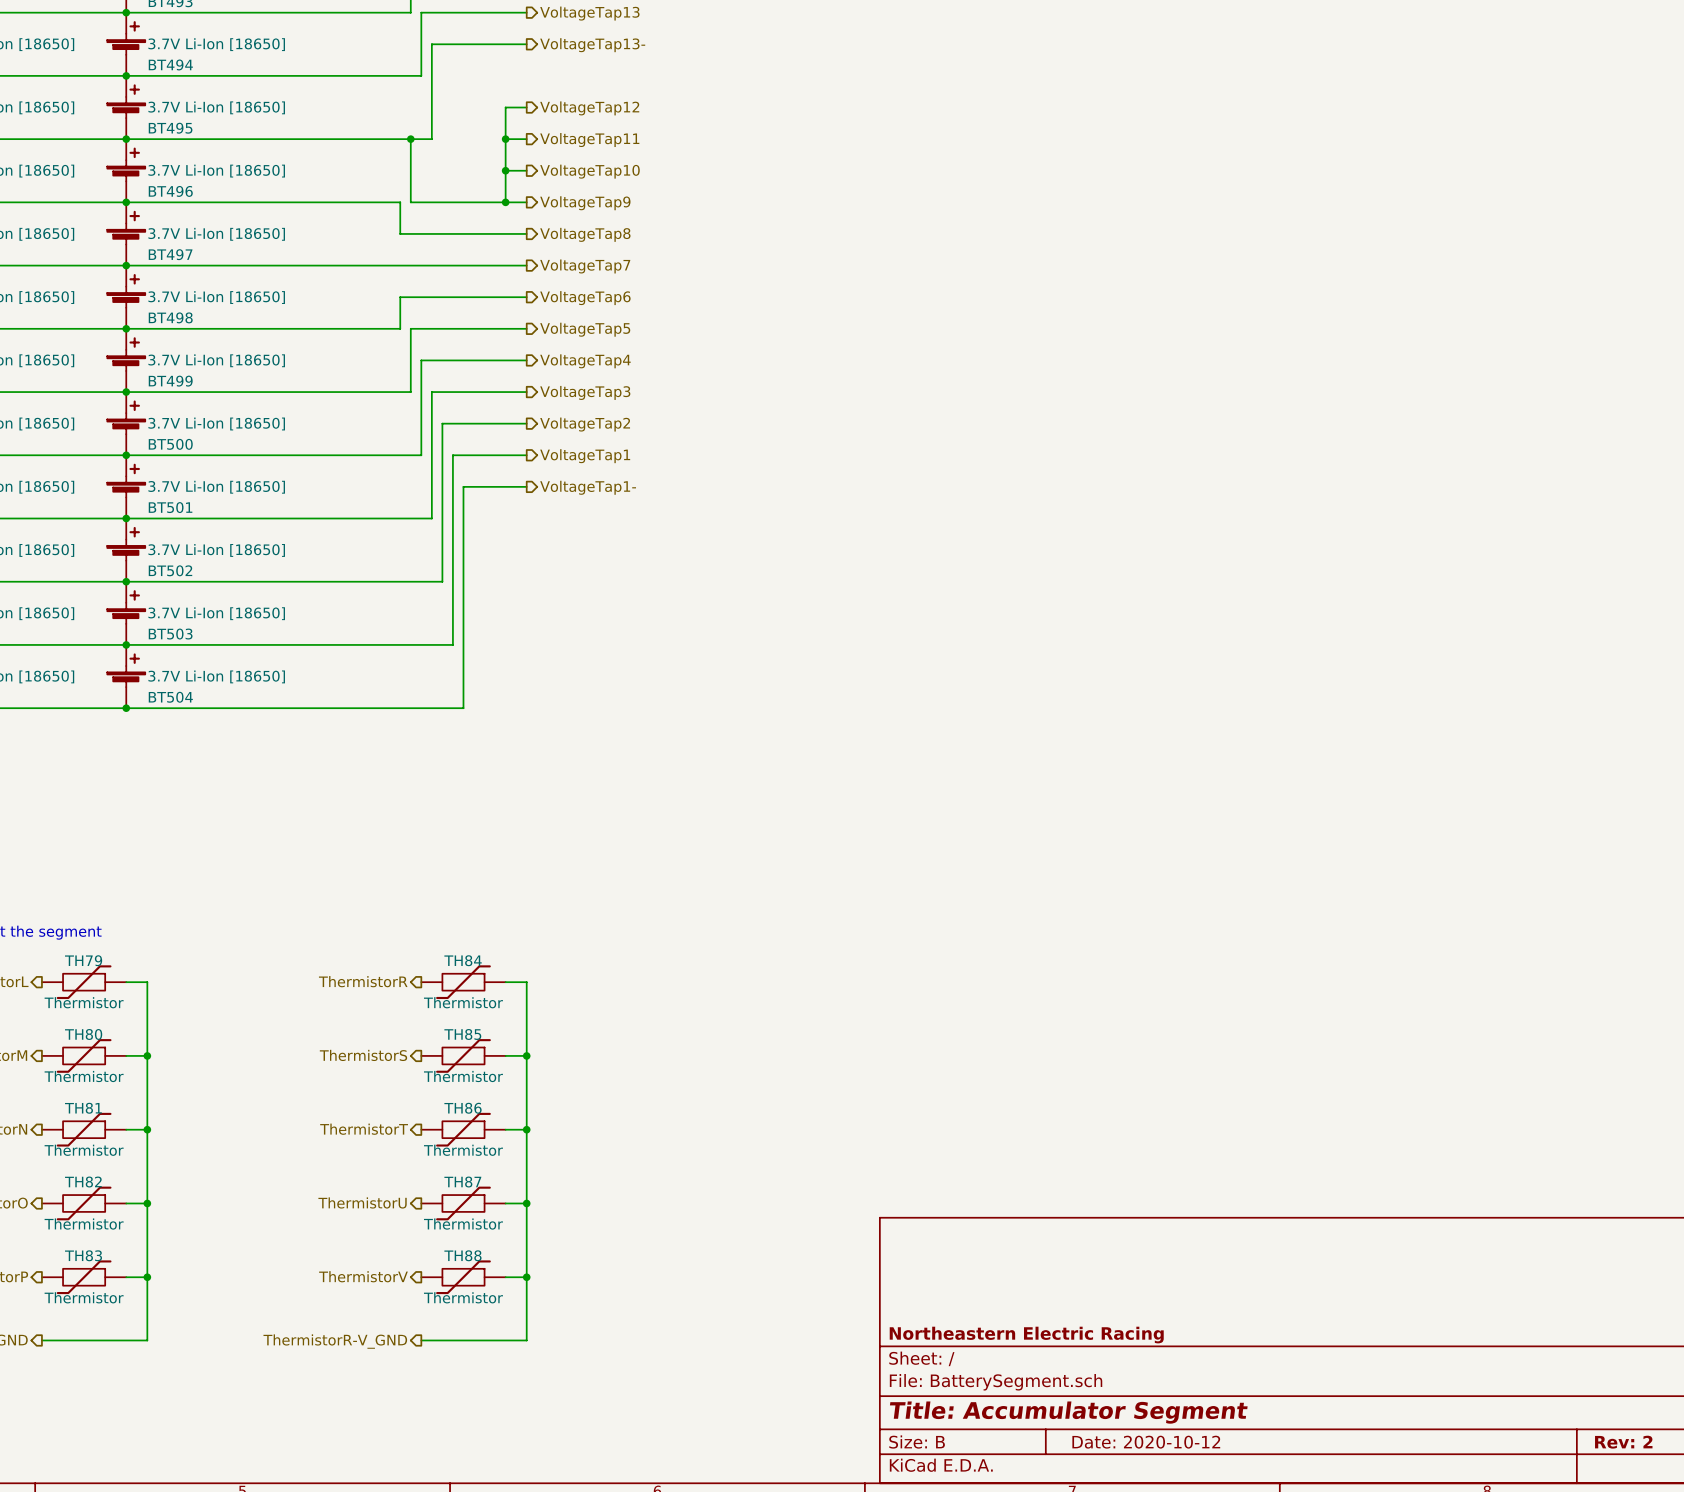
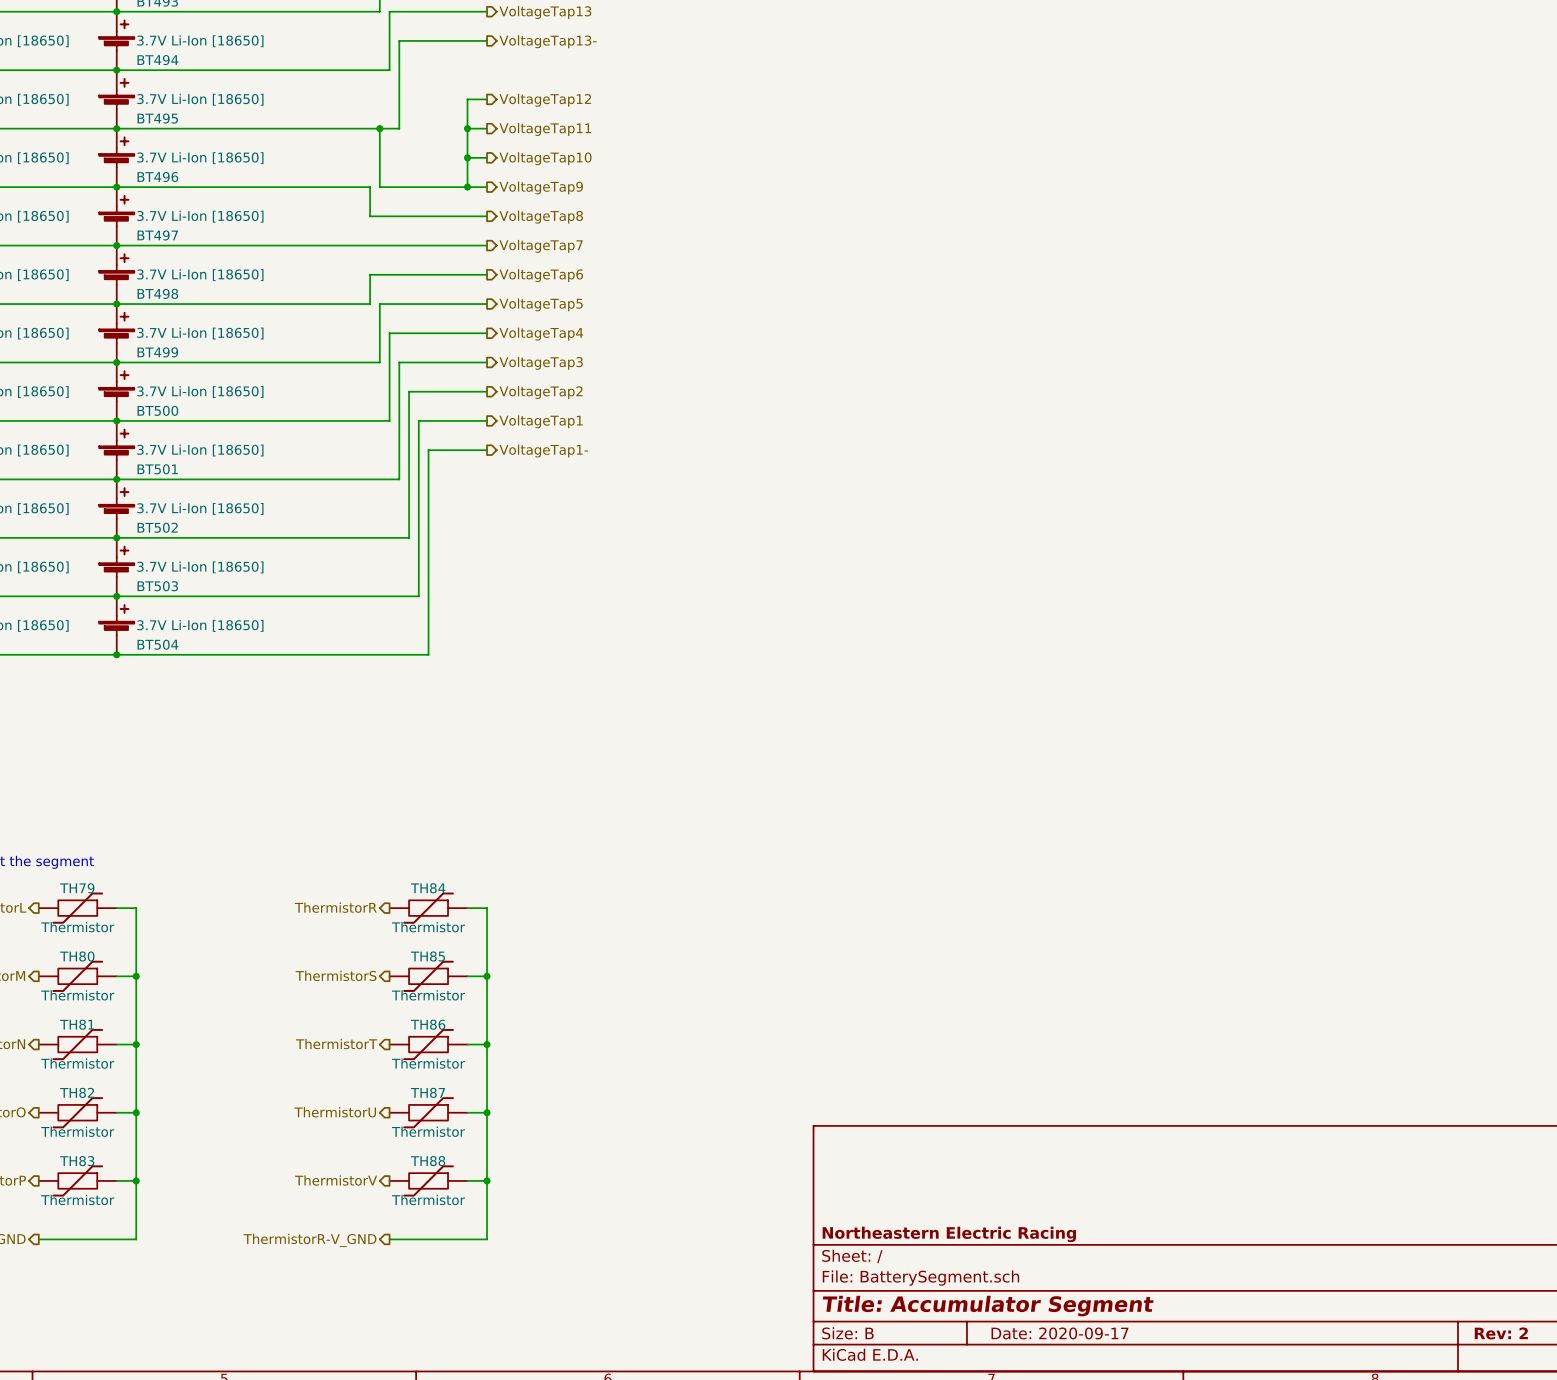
title block: Date: 2020-10-12 (1146, 1442) -> Date: 2020-09-17 (1059, 1333)

